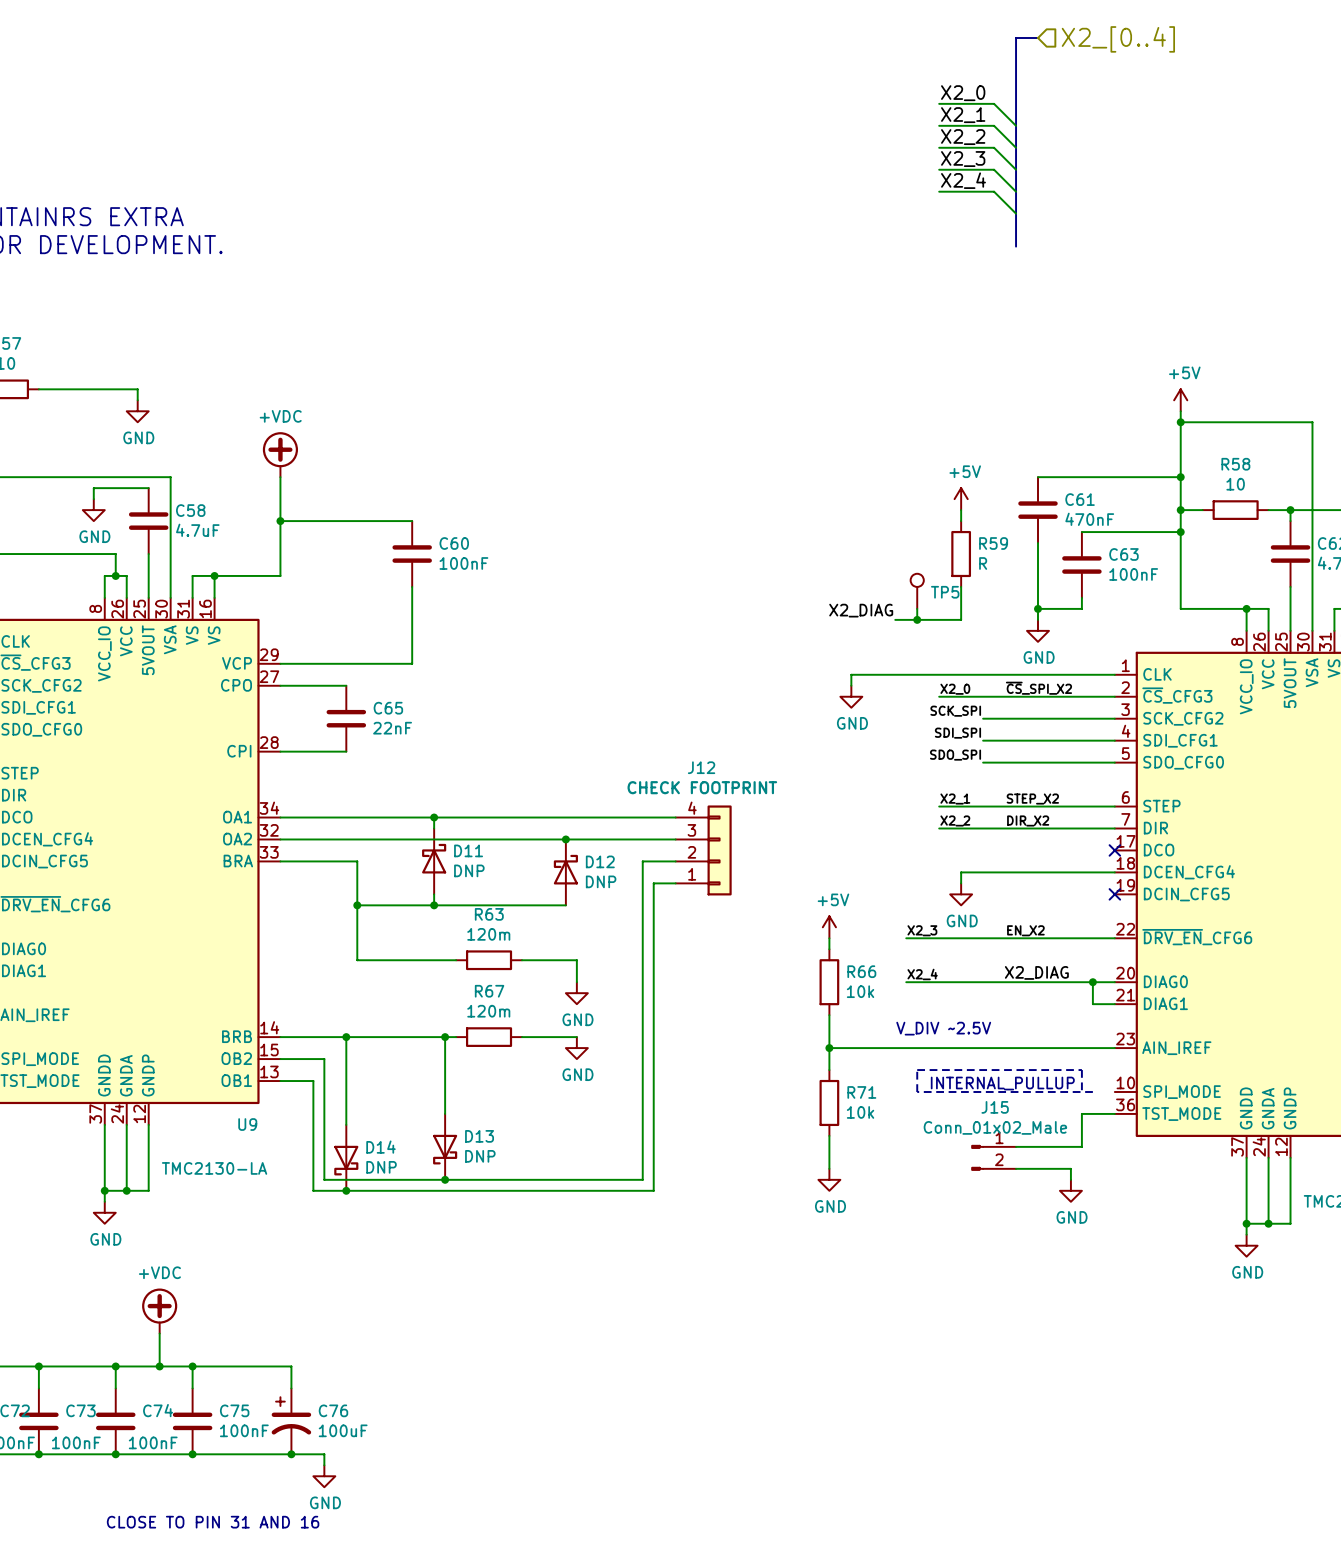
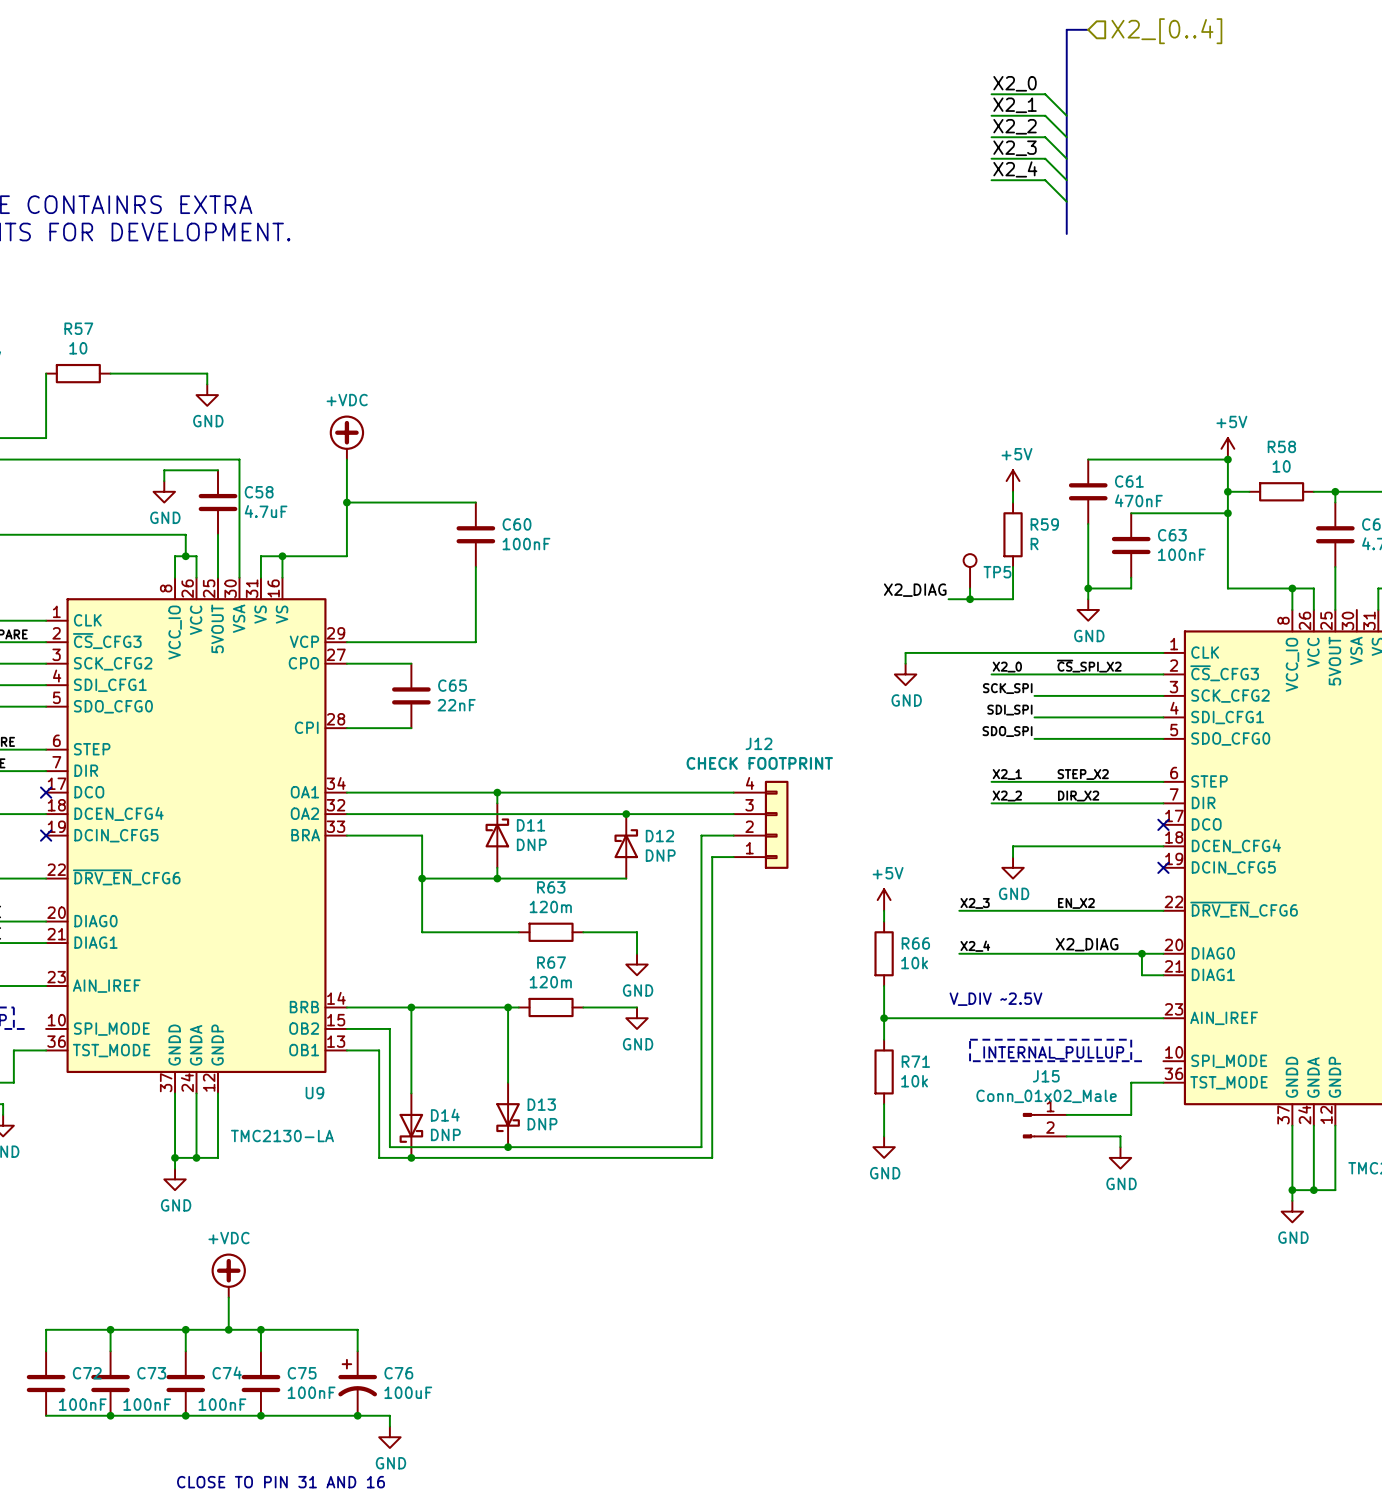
power symbol position: +5V (1180, 400) -> +5V (1227, 448)
wire: (1180, 411) (1180, 477) -> none
wire: (1180, 422) (1312, 422) (1312, 630) -> none
junction: (1180, 422) -> none

